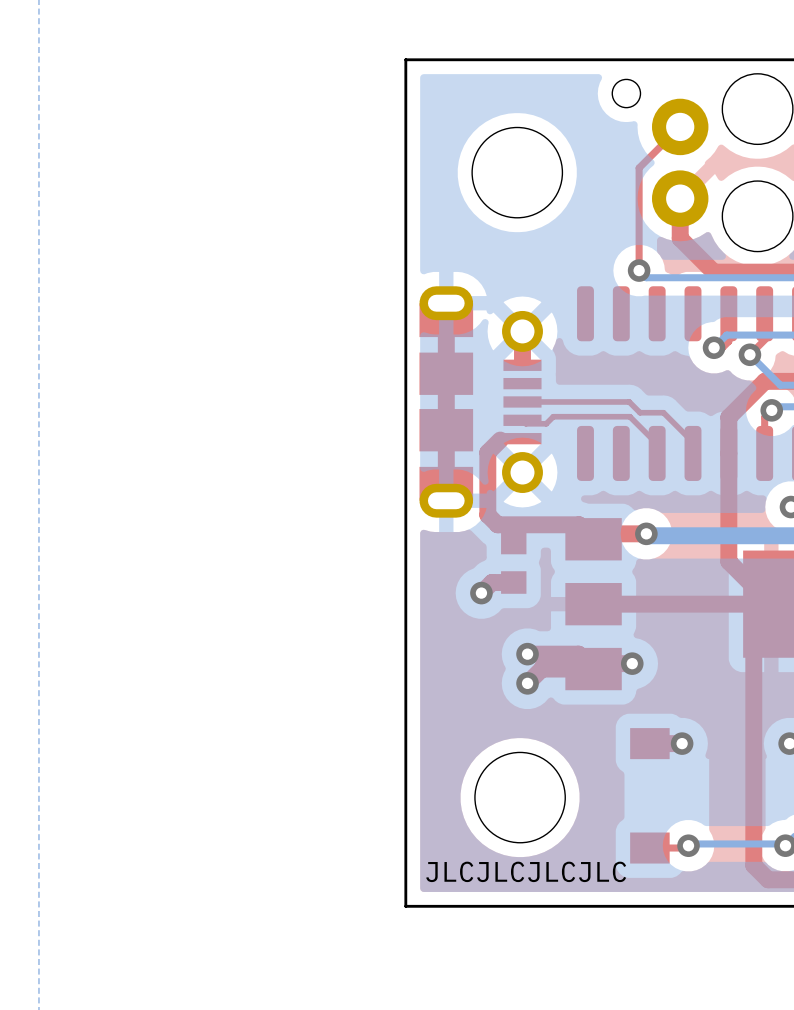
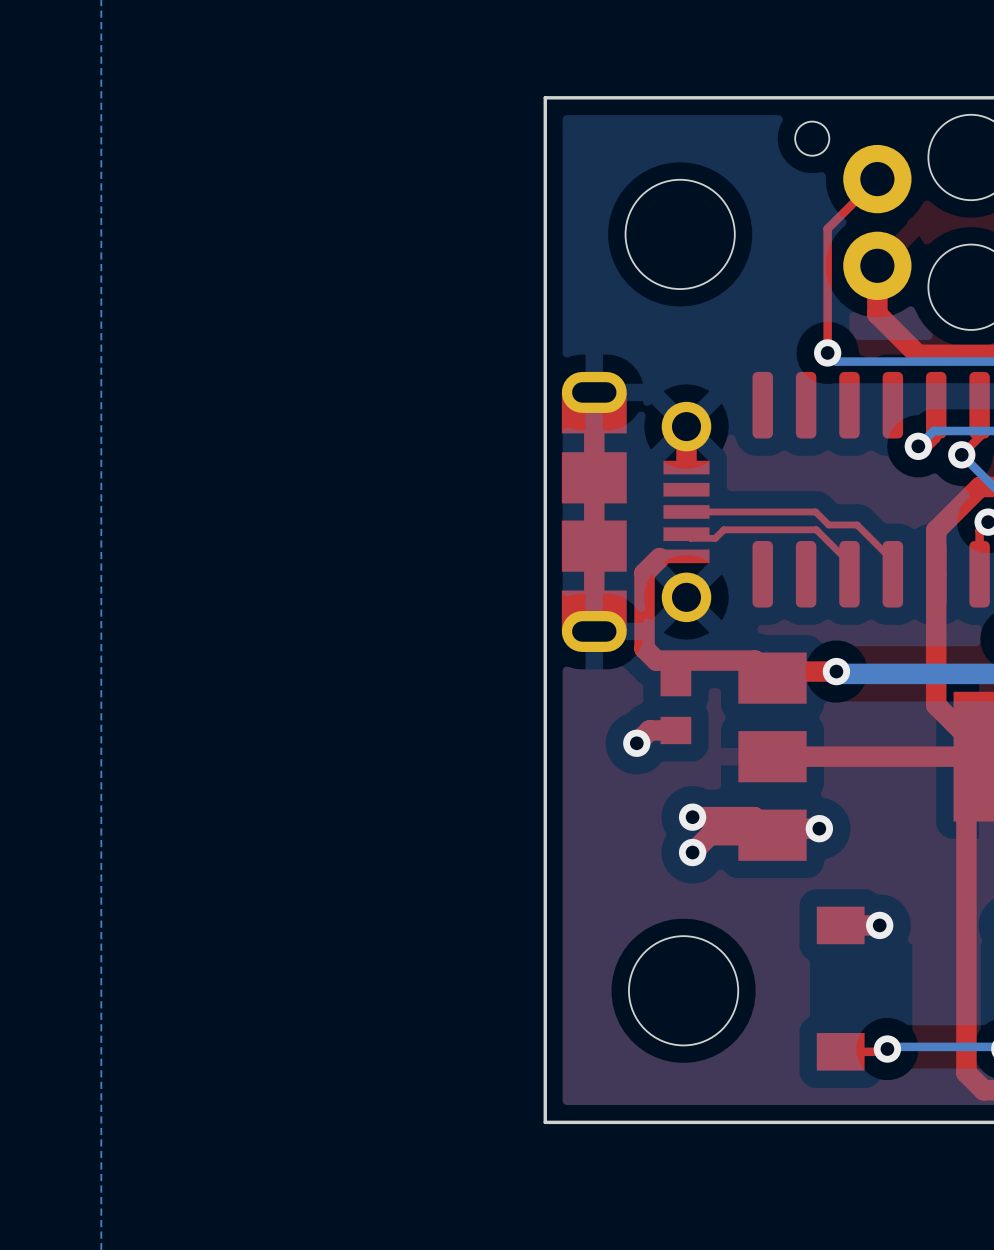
text: JLCJLCJLCJLC (526, 871) -> none

